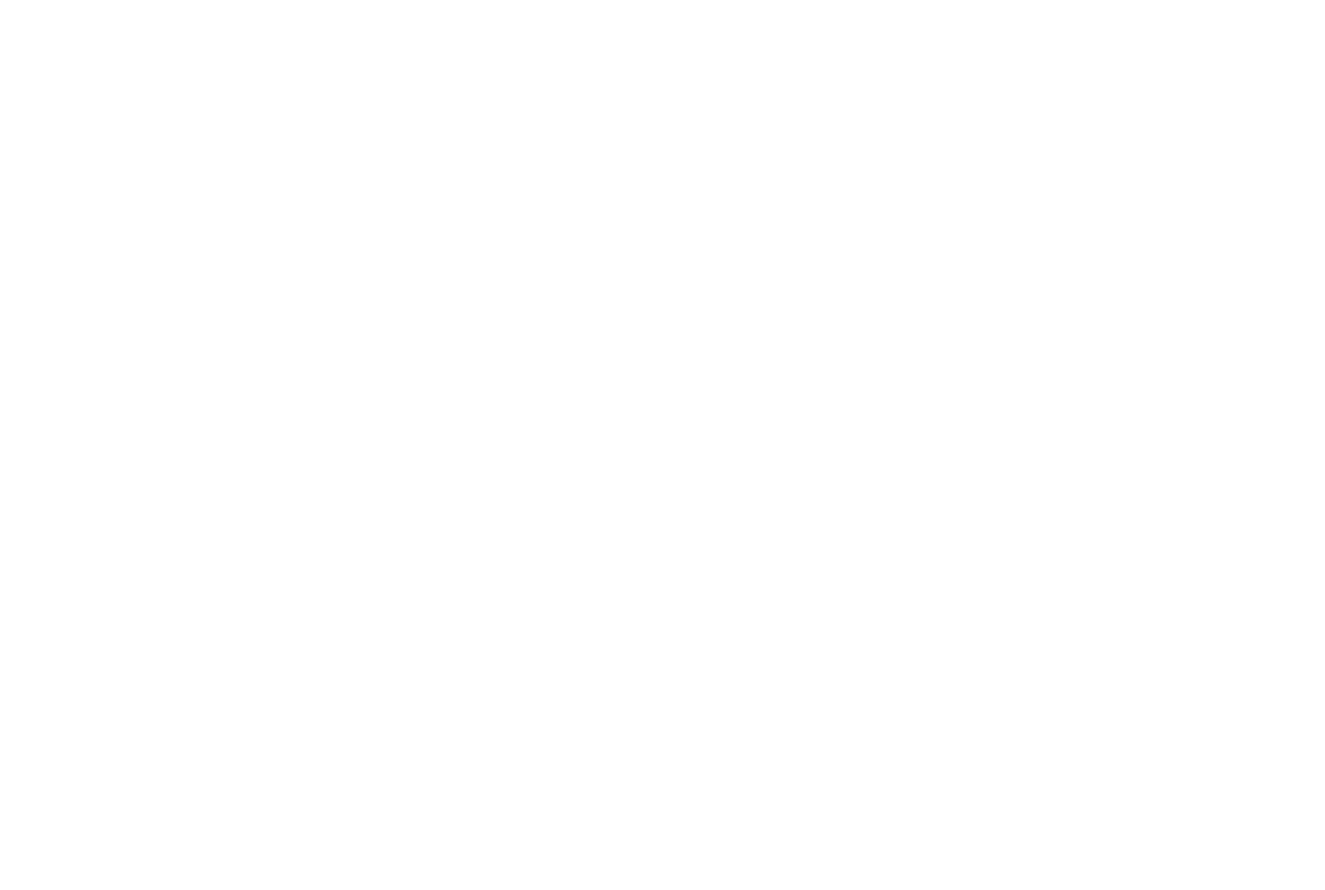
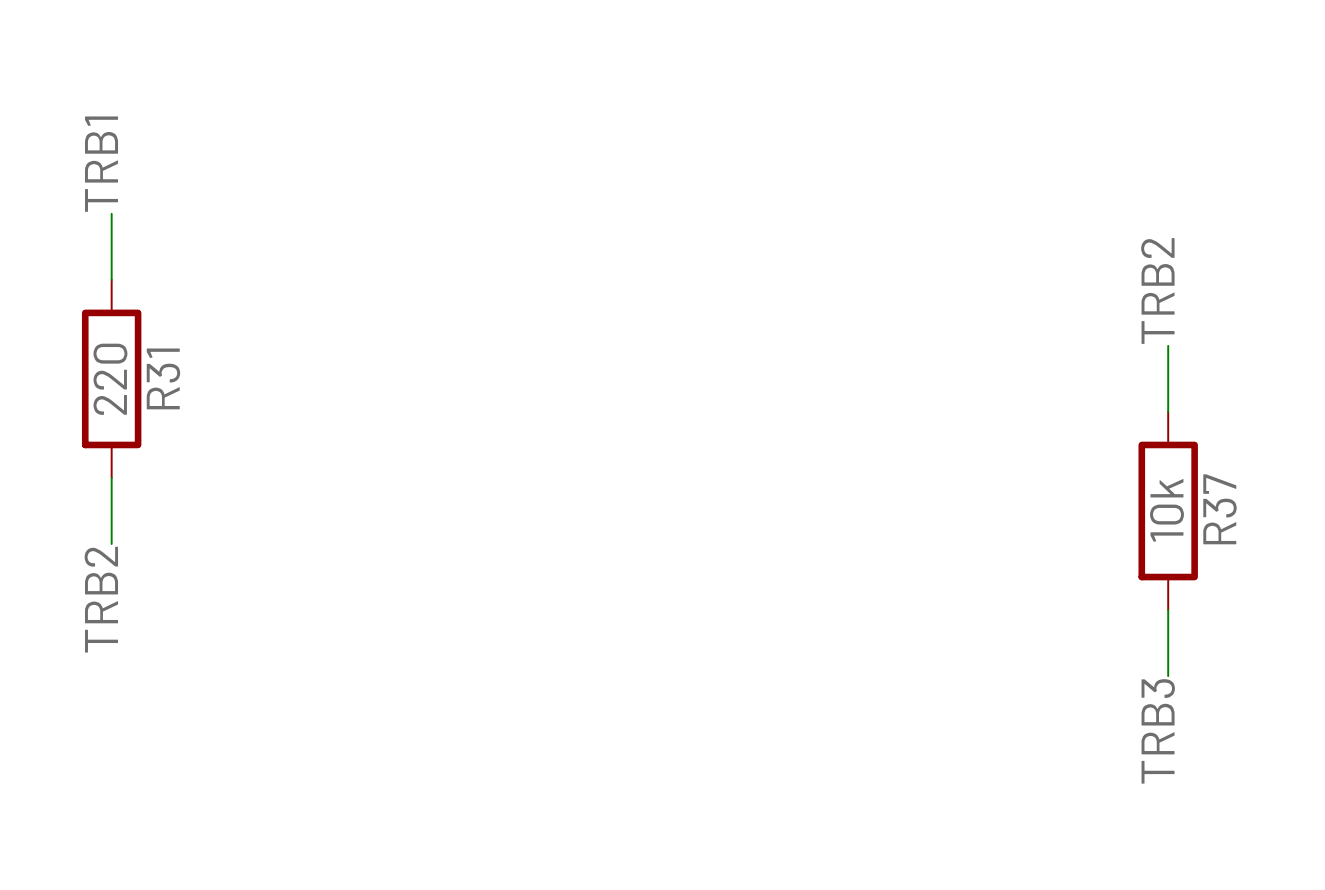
label: none -> TRB1 (101, 164)
wire: none -> (111, 213) (111, 279)
label: none -> TRB2 (1157, 290)
wire: none -> (1168, 345) (1168, 411)
R31: none -> 220 (111, 378)
wire: none -> (111, 477) (111, 544)
R37: none -> 10k (1168, 511)
label: none -> TRB2 (101, 599)
wire: none -> (1168, 610) (1168, 676)
label: none -> TRB3 (1158, 731)

